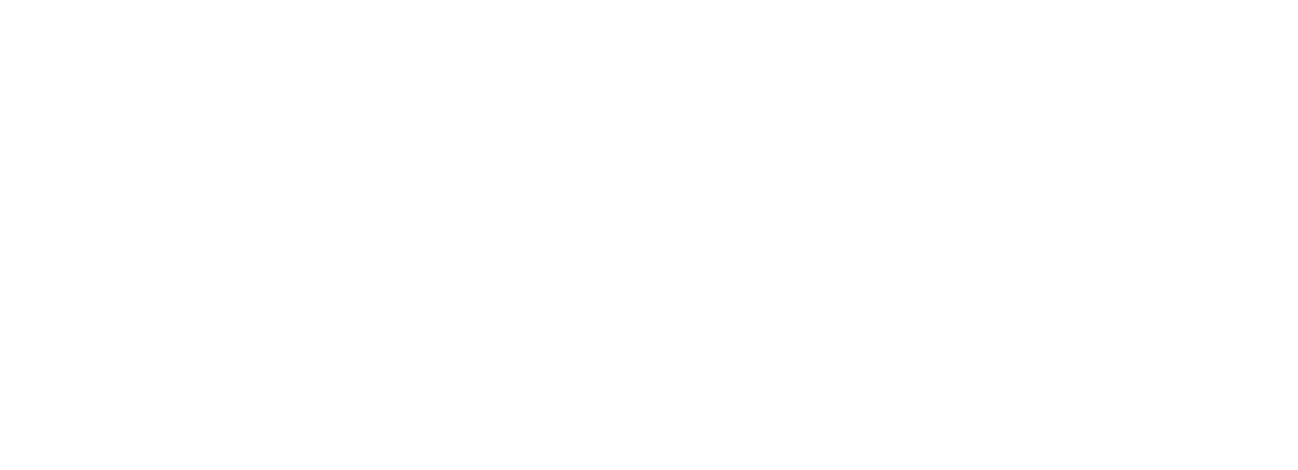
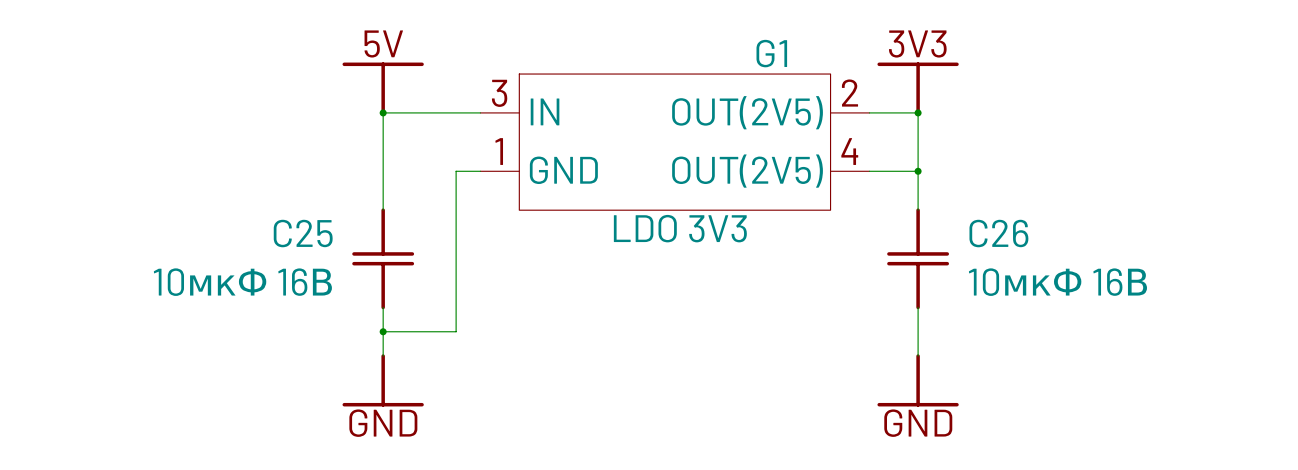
power symbol: none -> (383, 88)
power symbol: none -> (918, 88)
junction: none -> (383, 112)
wire: none -> (480, 112) (383, 112) (383, 210)
wire: none -> (869, 112) (918, 112) (918, 210)
junction: none -> (918, 112)
G1: none -> (674, 142)
wire: none -> (480, 171) (456, 171) (456, 331) (383, 331)
wire: none -> (869, 171) (918, 171)
junction: none -> (918, 171)
C25: none -> (383, 258)
C26: none -> (918, 258)
wire: none -> (383, 307) (383, 356)
wire: none -> (918, 307) (918, 356)
junction: none -> (383, 331)
power symbol: none -> (383, 380)
power symbol: none -> (918, 380)

